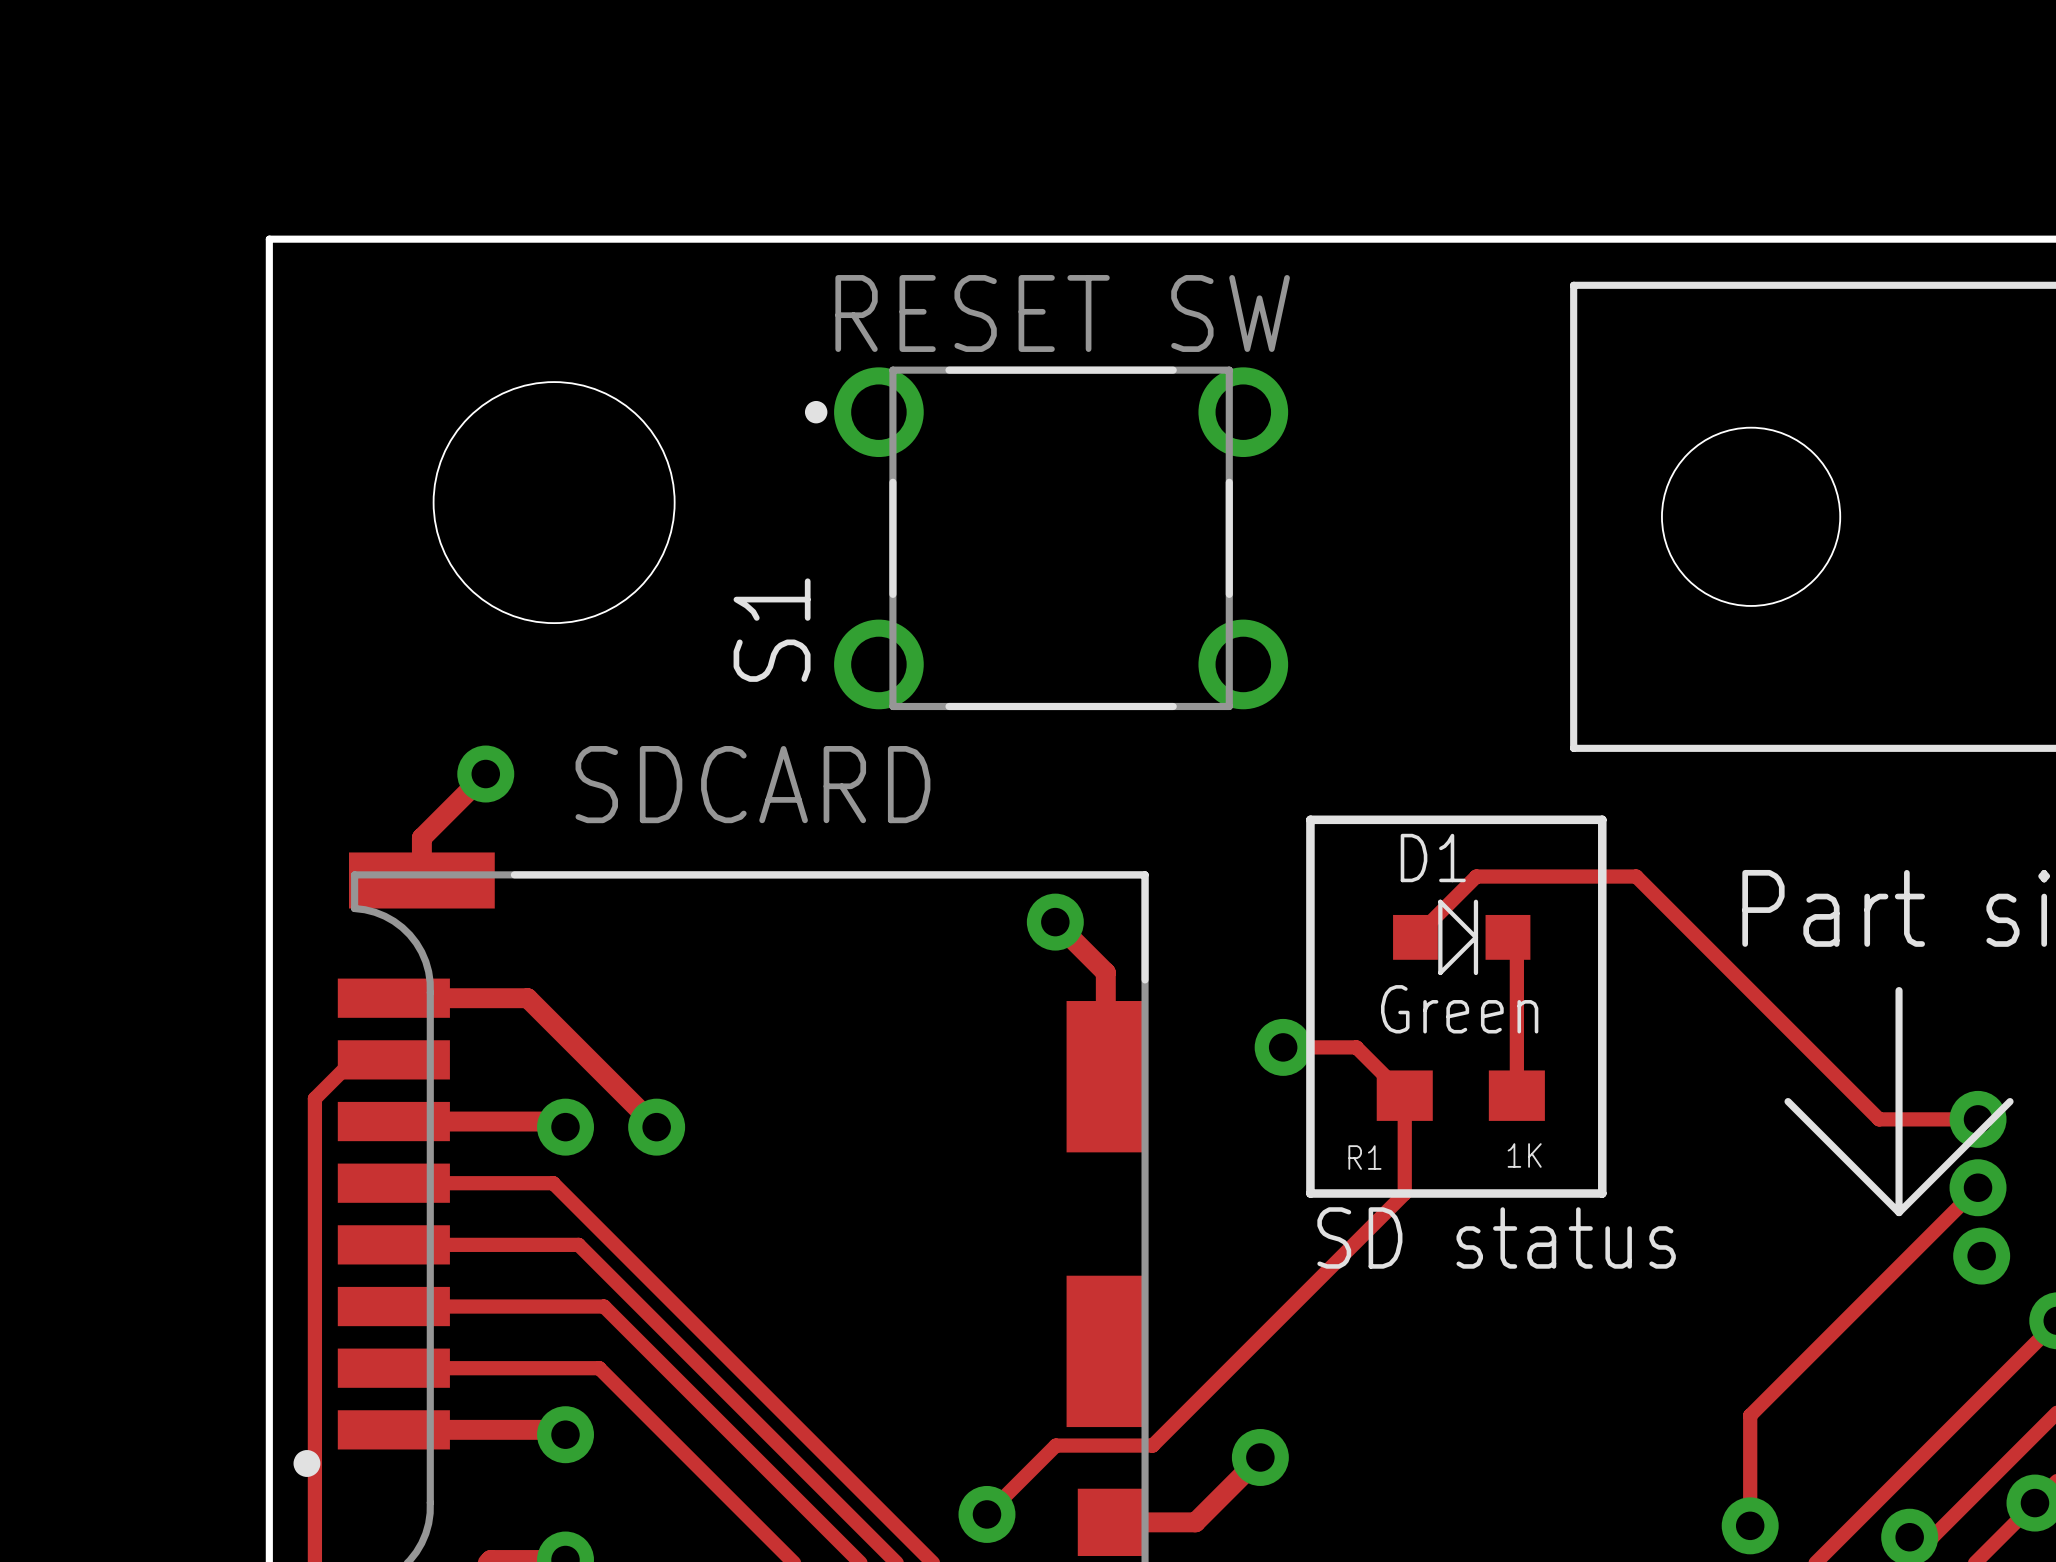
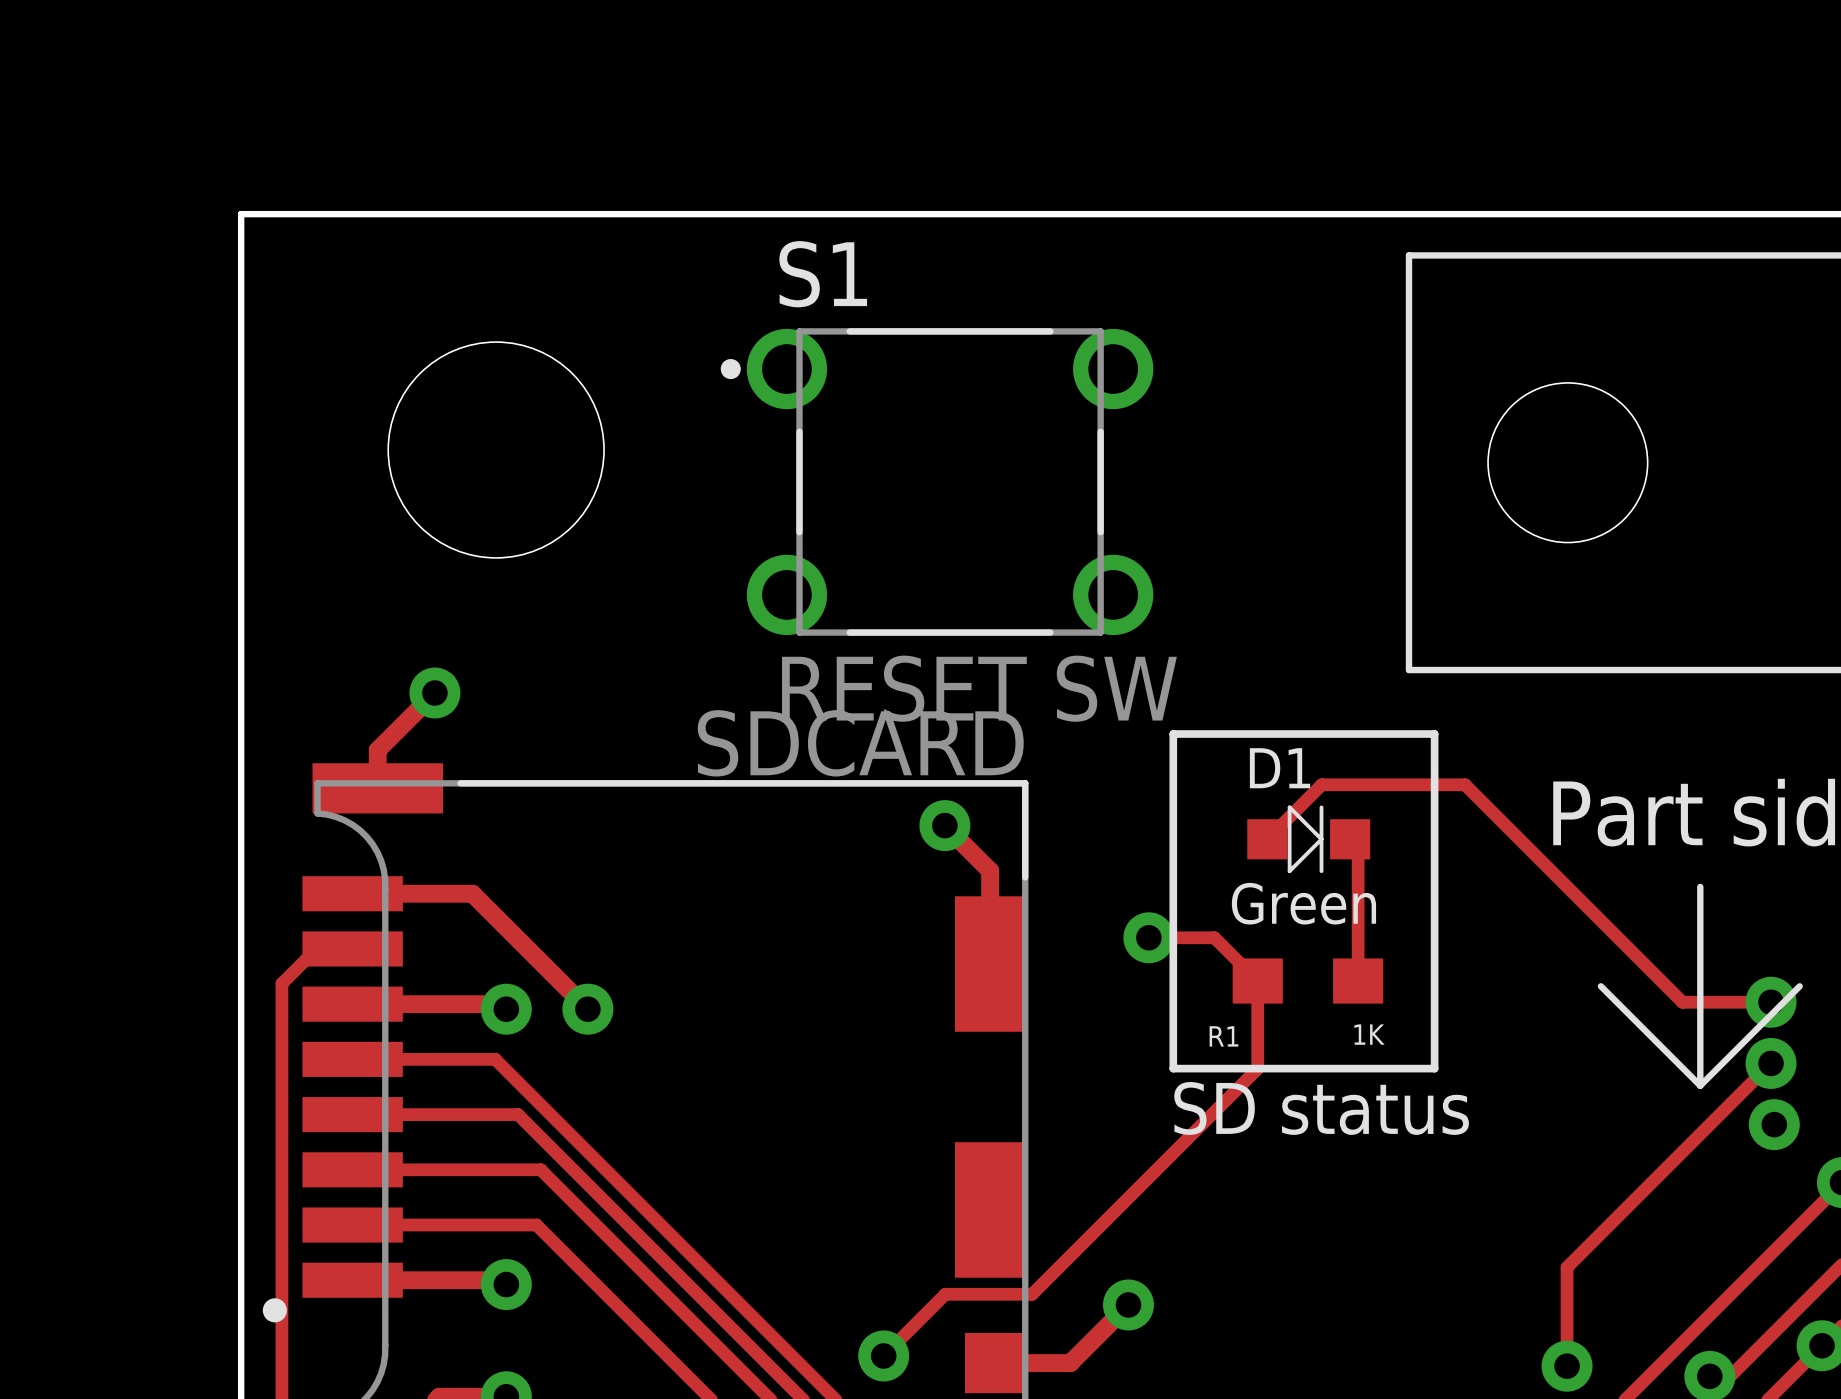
S1 value position: RESET SW (1062, 313) -> RESET SW (979, 688)
S1 name rotation: 0° (772, 630) -> 90° clockwise (823, 274)
S1 name position: S1 (772, 630) -> S1 (823, 274)
part value position: SDCARD (752, 784) -> SDCARD (860, 743)

